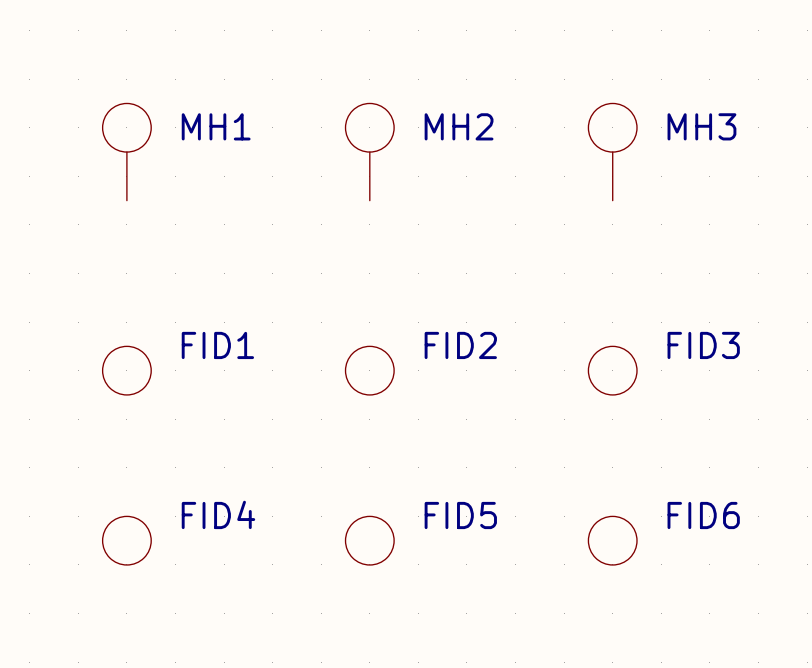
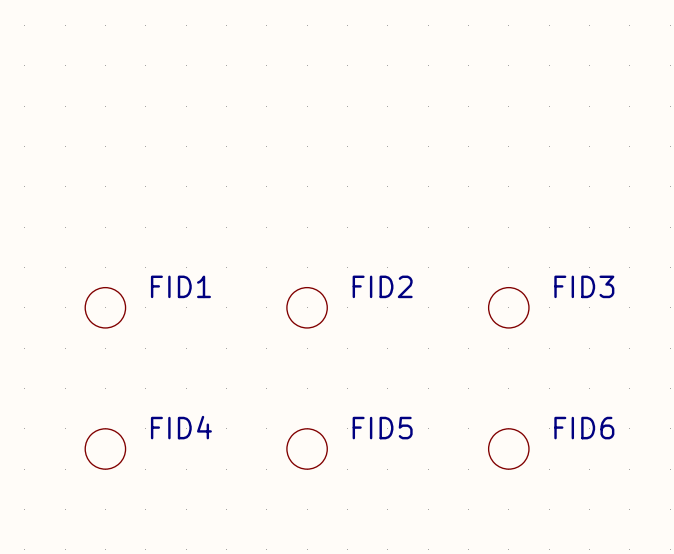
MH1: (126, 152) -> none
MH2: (369, 152) -> none
MH3: (612, 152) -> none

